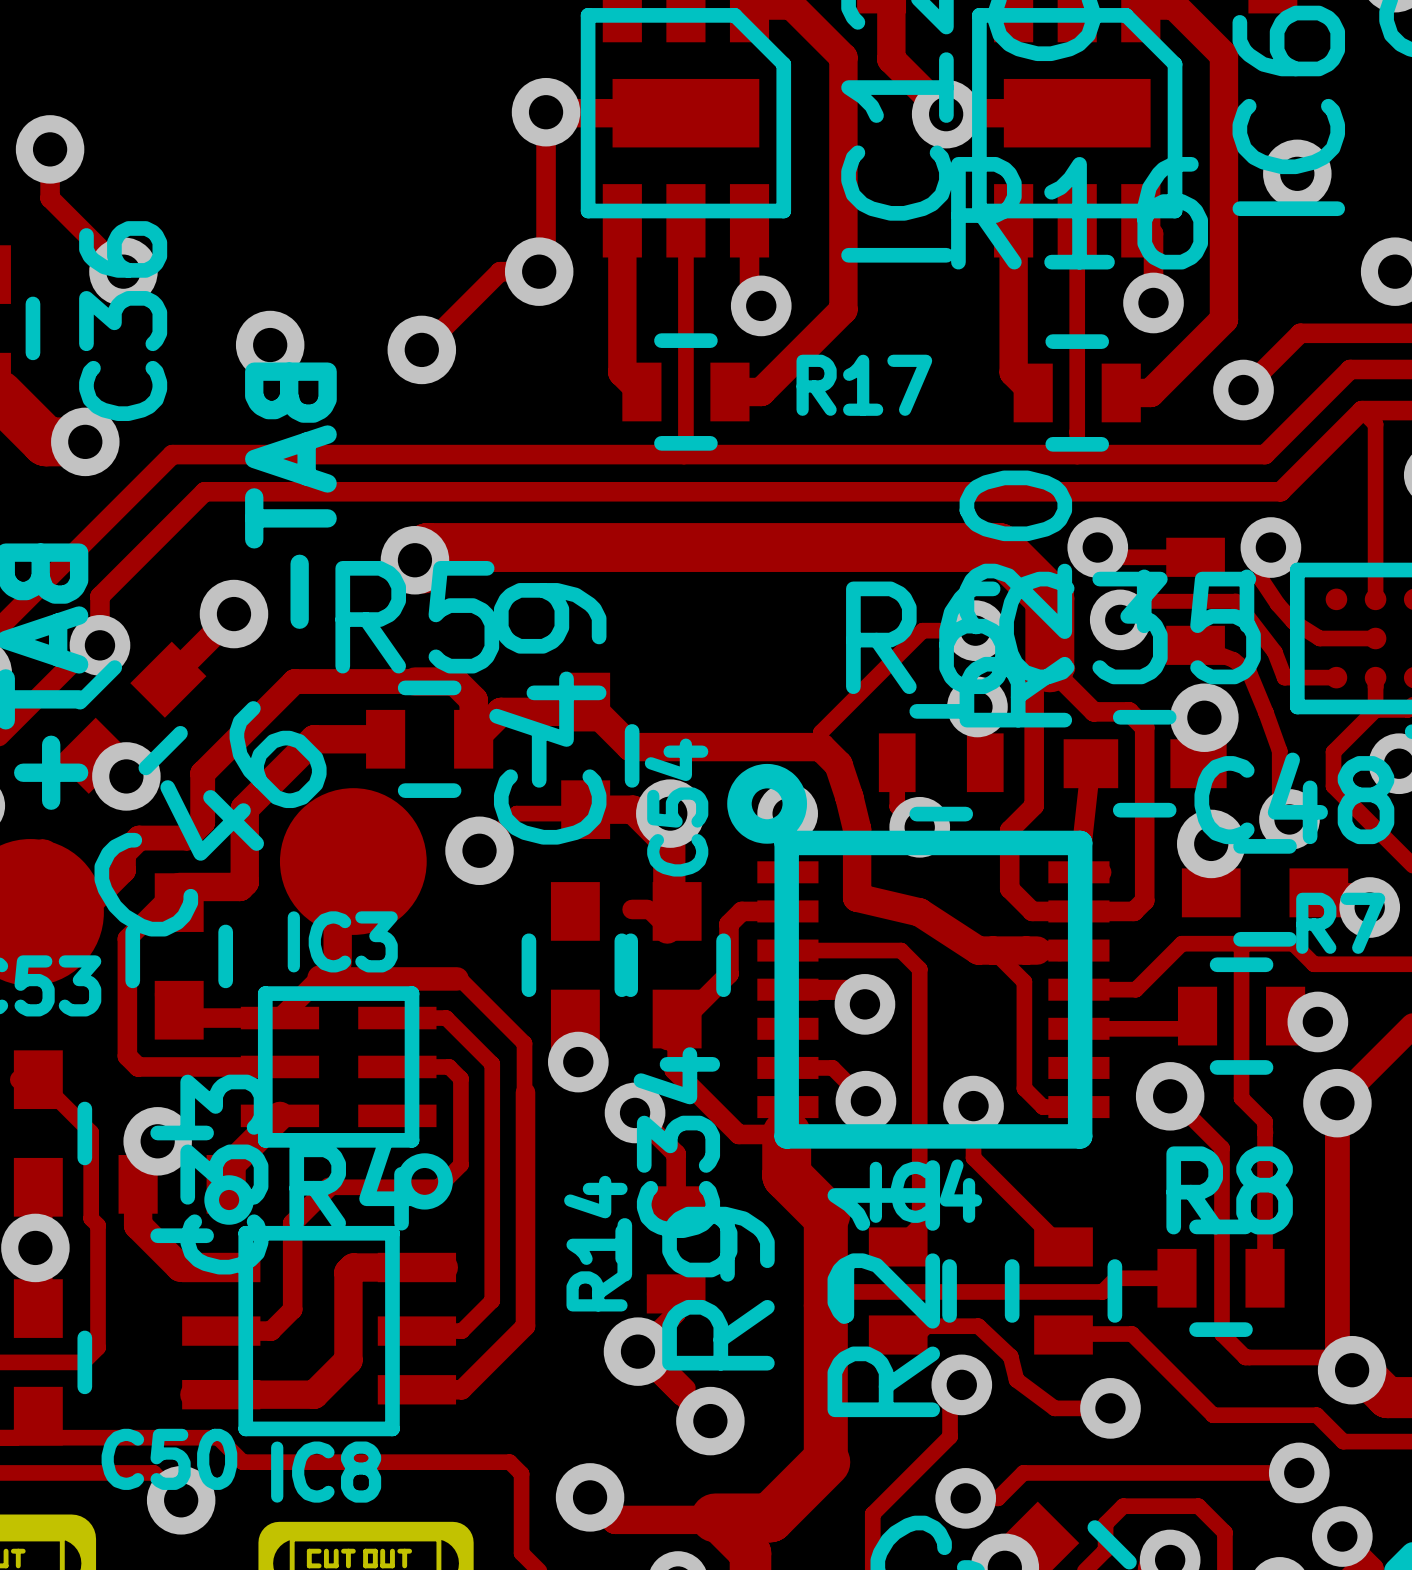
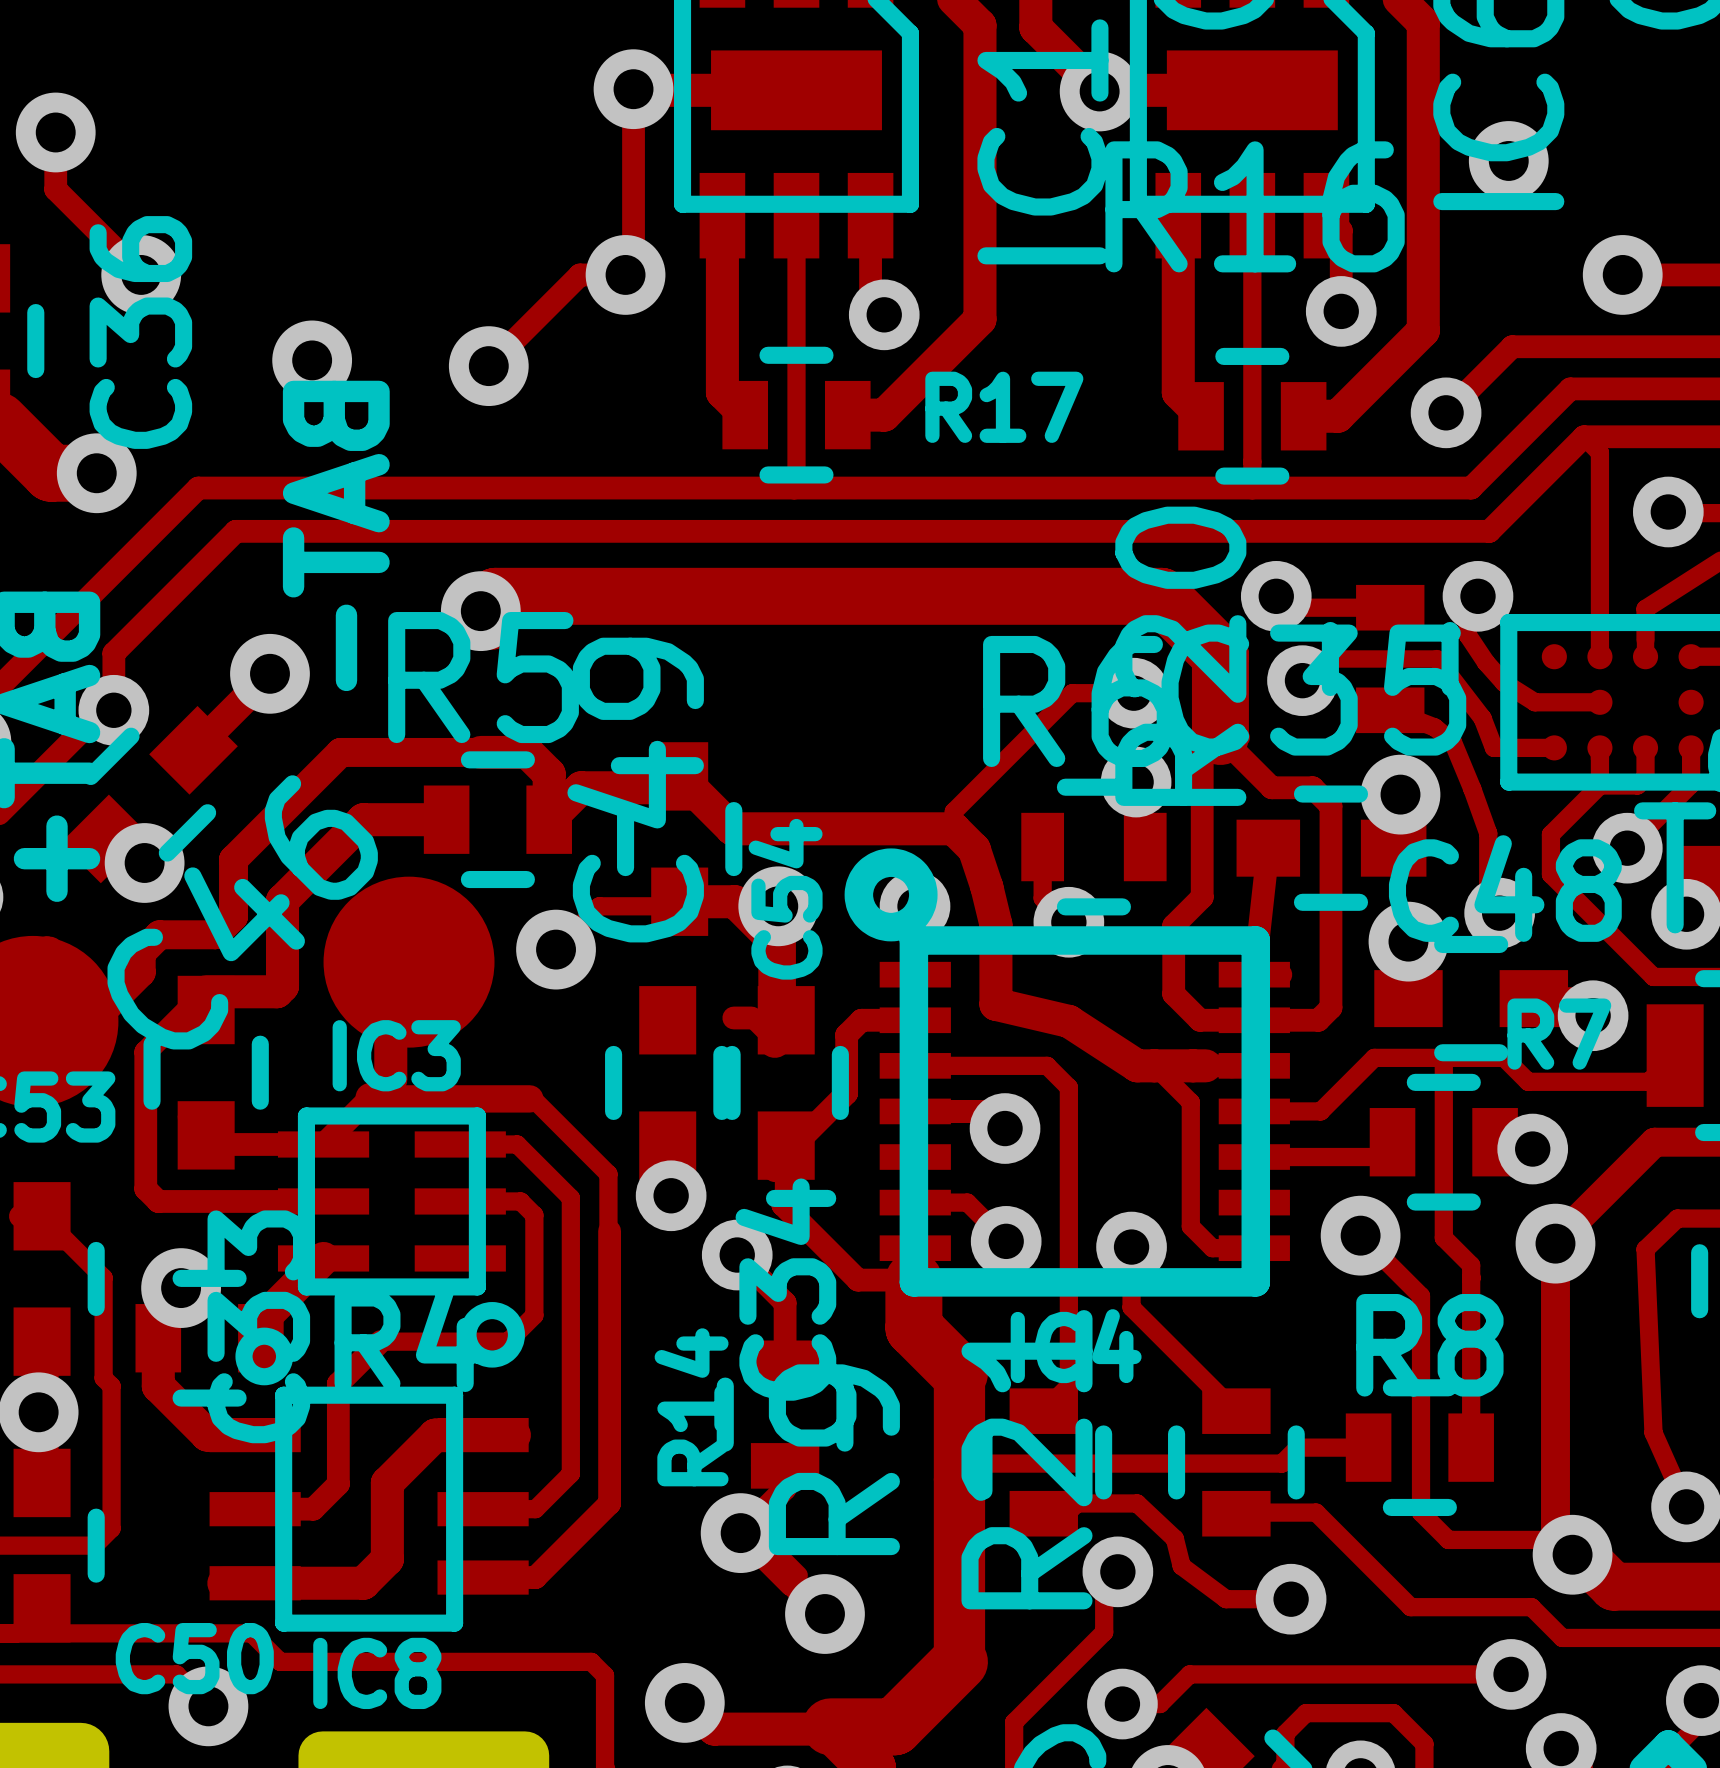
track: (375, 1267) (353, 1267) (348, 1272) (348, 1360) (334, 1374) -> (435, 1435) (387, 1482) (387, 1559)

